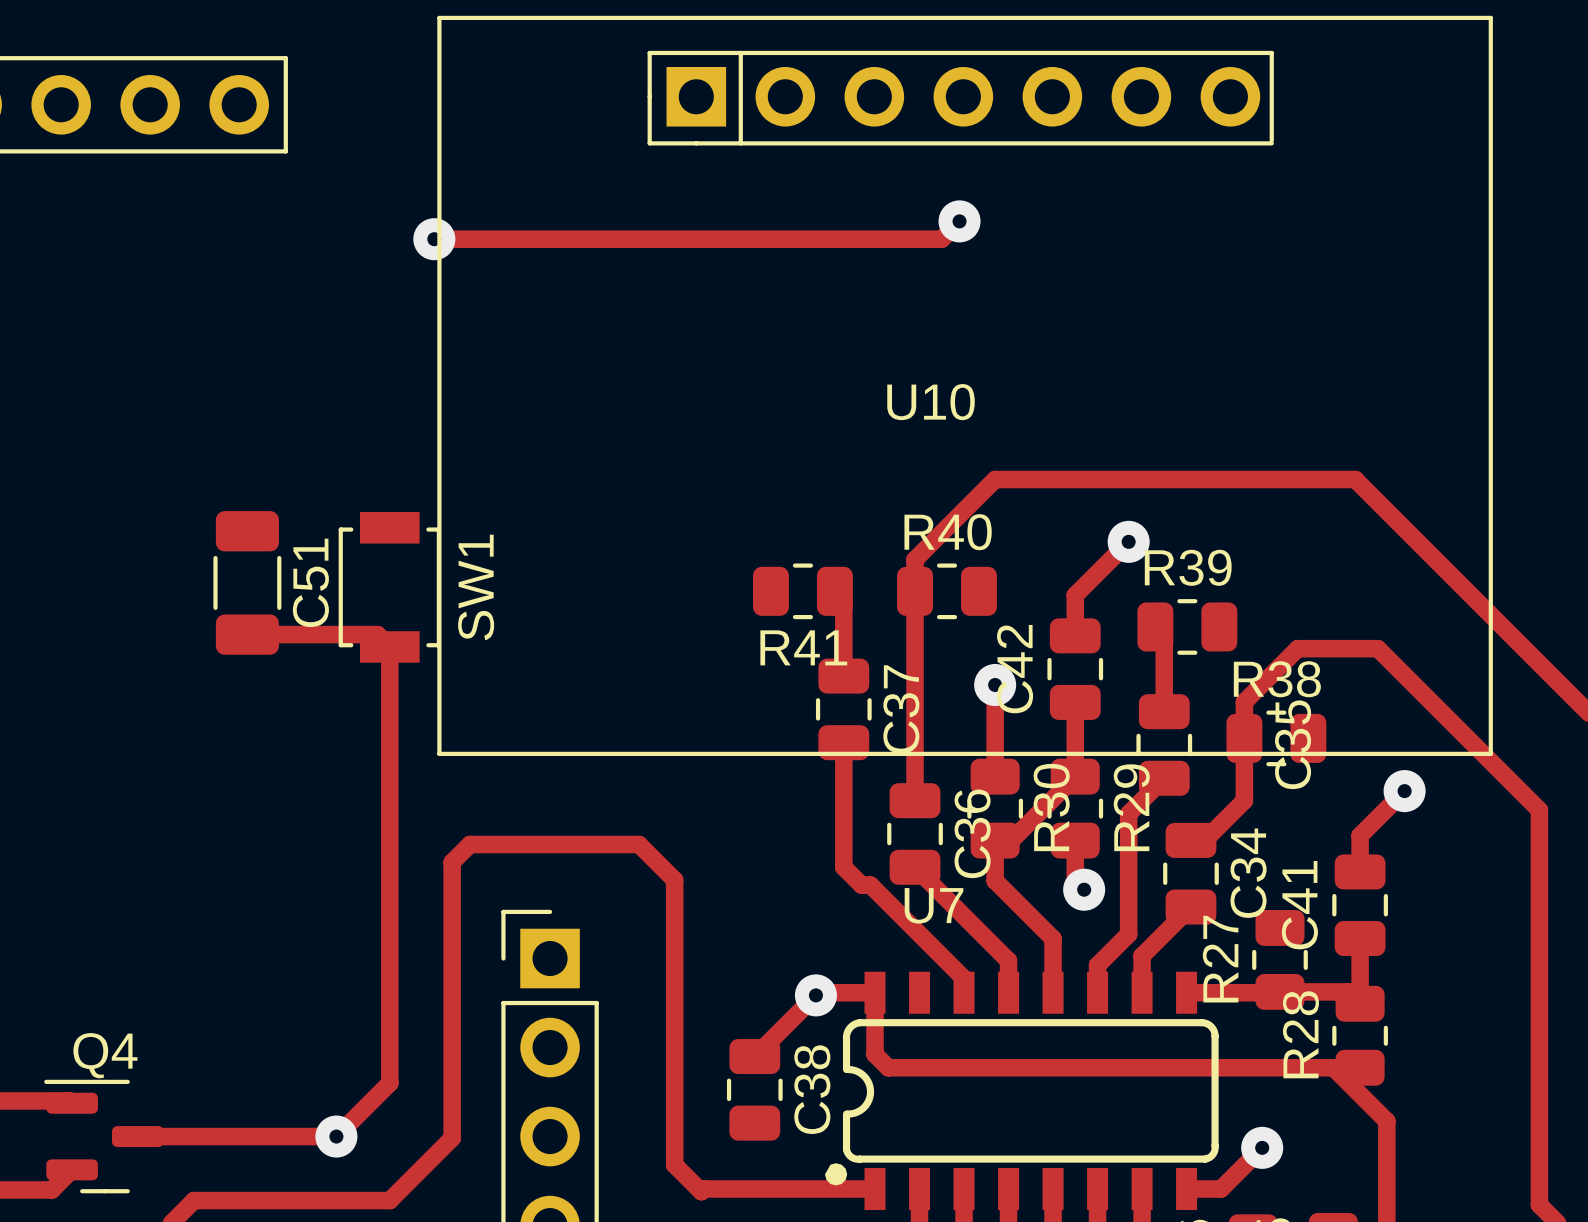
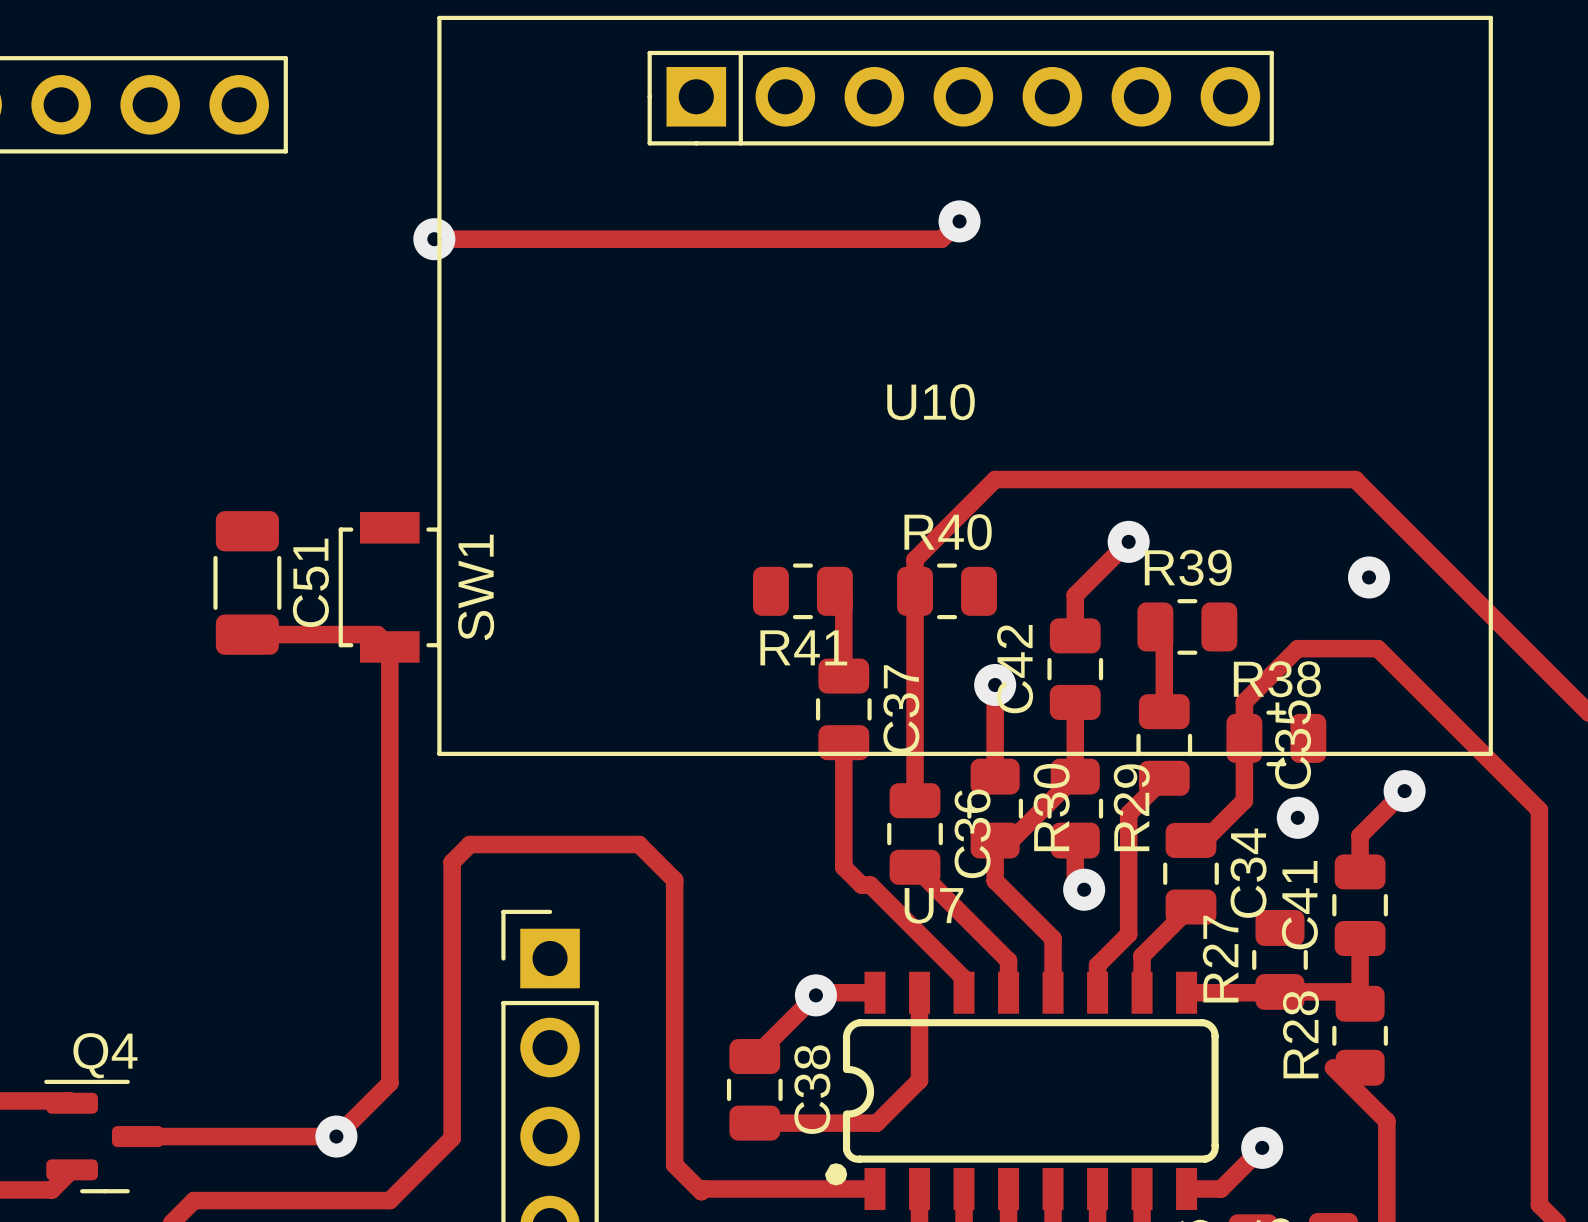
via: none -> (1369, 577)
via: none -> (1297, 817)
track: (875, 992) (875, 1054) (888, 1067) (1333, 1067) -> none
track: none -> (919, 992) (919, 1080) (876, 1123) (754, 1123)

